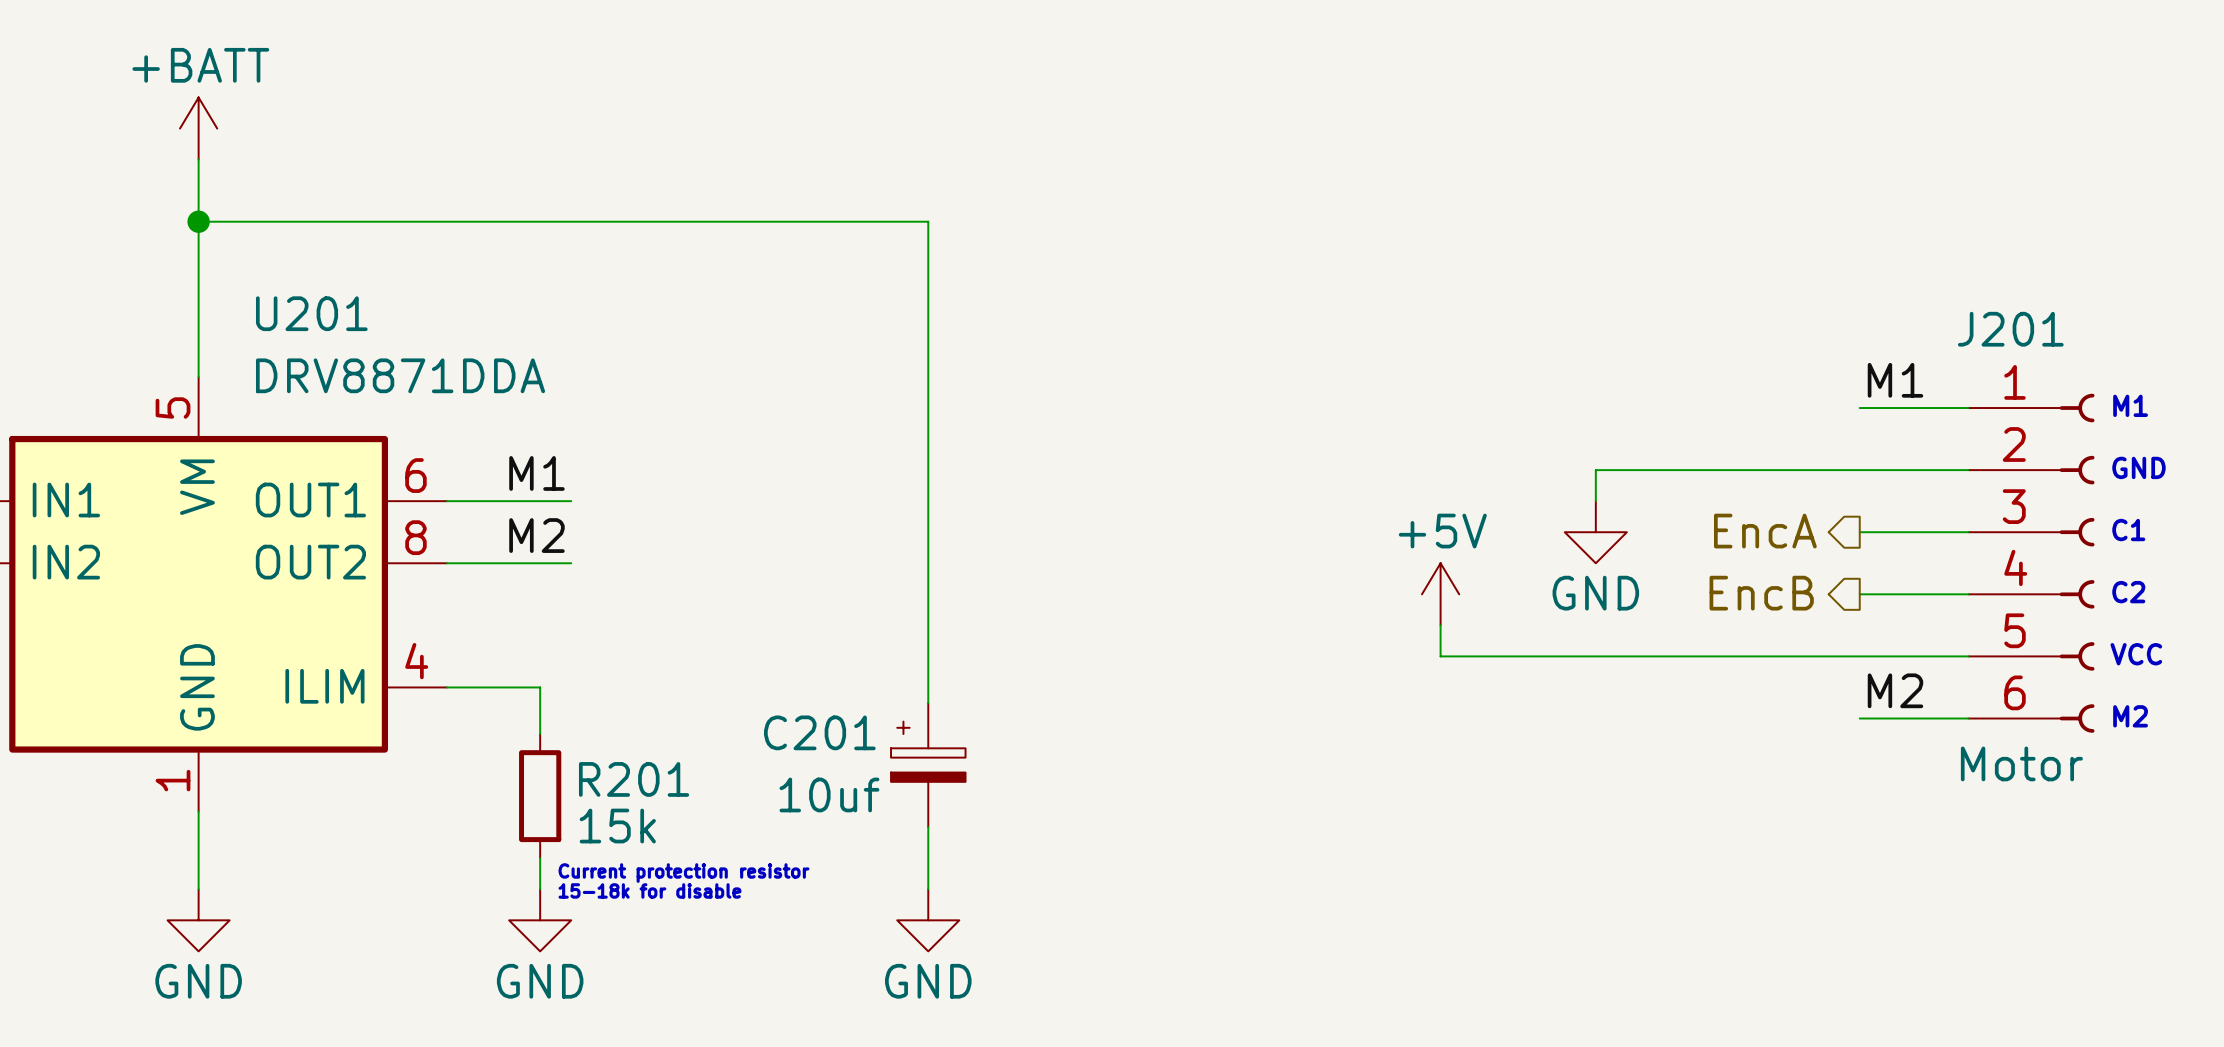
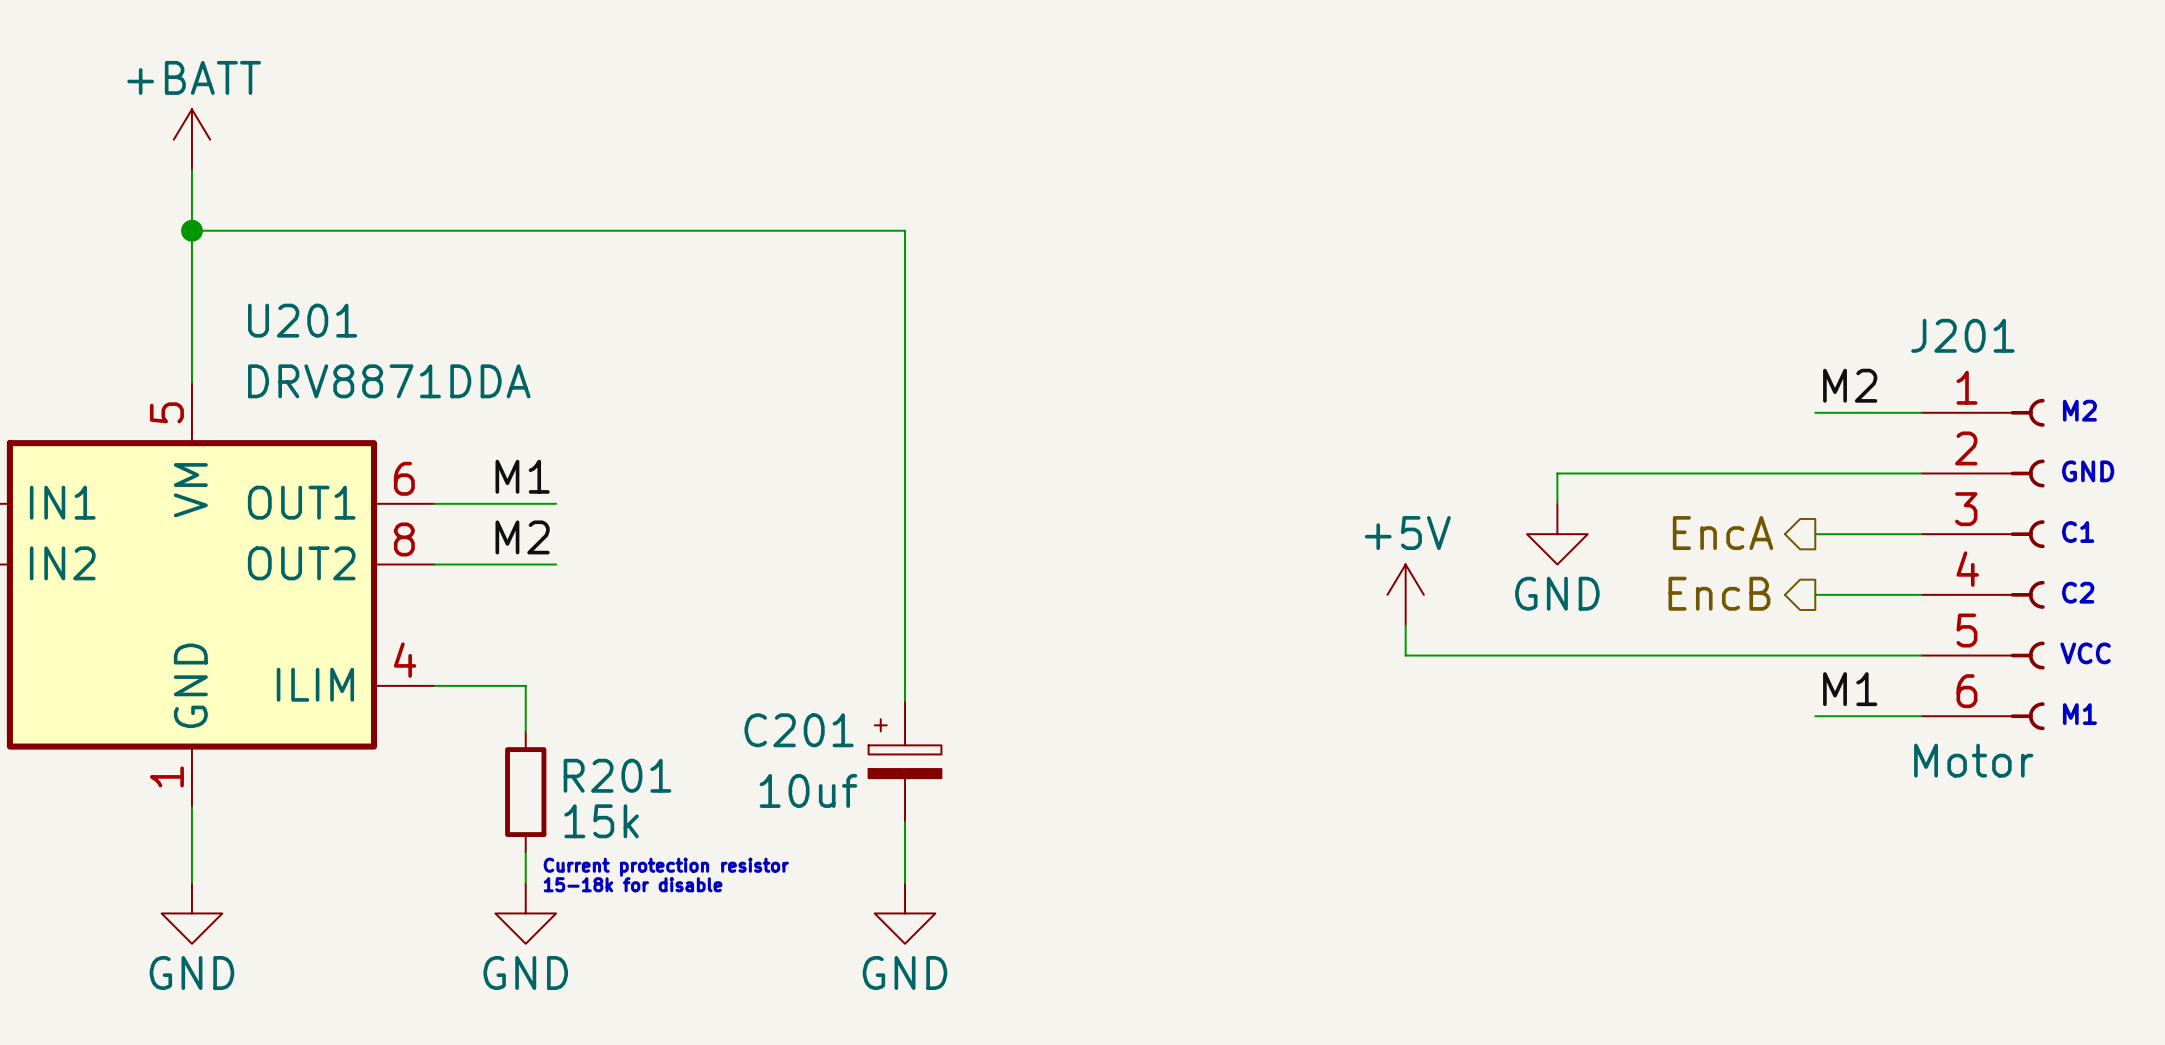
label: M1 (1895, 380) -> M2 (1850, 385)
text: M1 (2130, 405) -> M2 (2079, 410)
label: M2 (1895, 690) -> M1 (1850, 689)
text: M2 (2130, 716) -> M1 (2079, 714)

